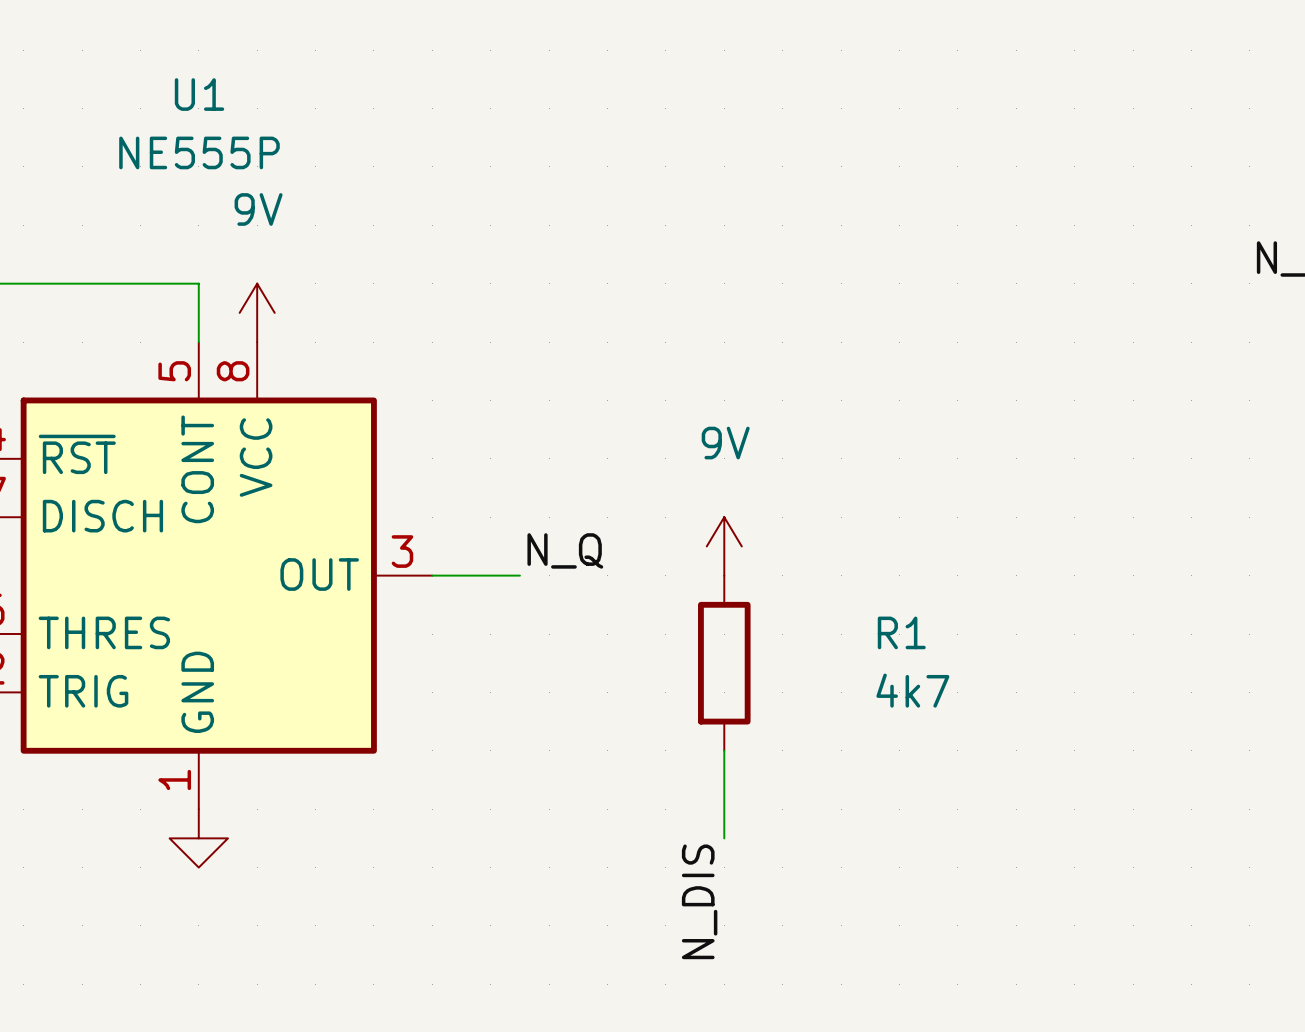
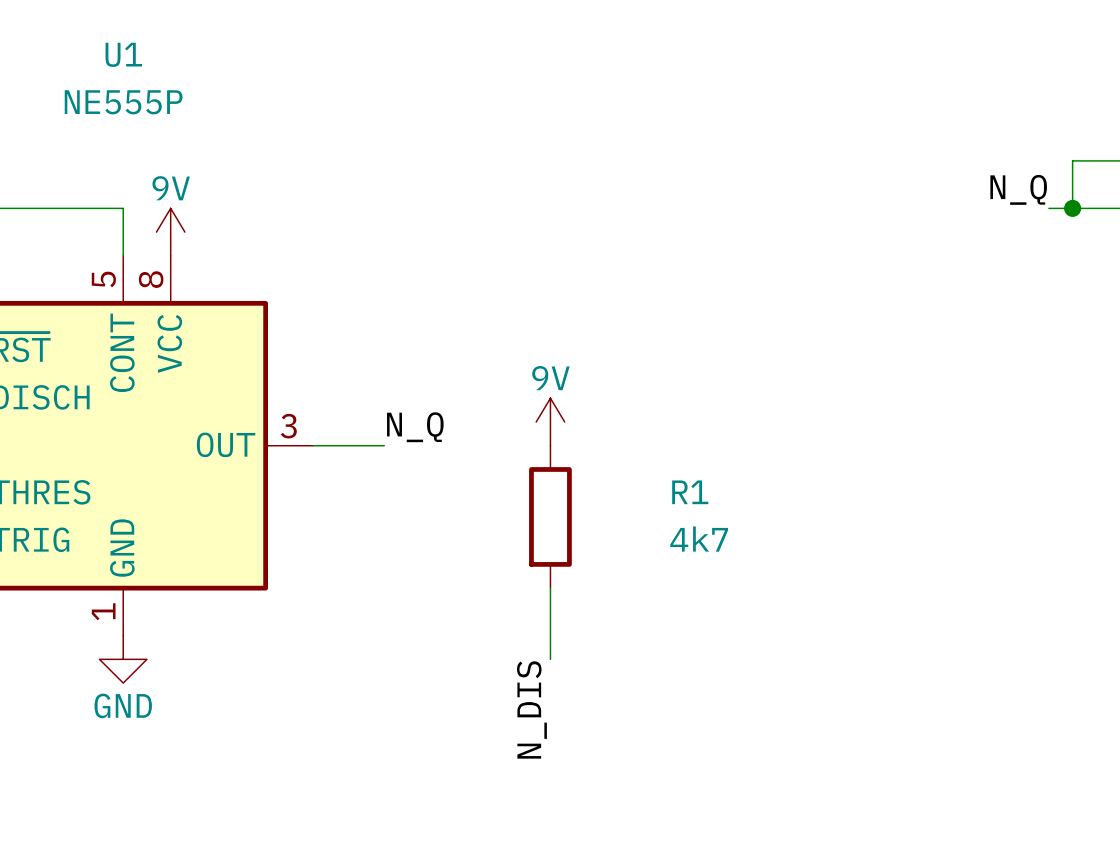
power symbol text position: 9V (258, 209) -> 9V (171, 188)
power symbol text position: 9V (725, 443) -> 9V (550, 378)
power symbol text: none -> GND (123, 705)

